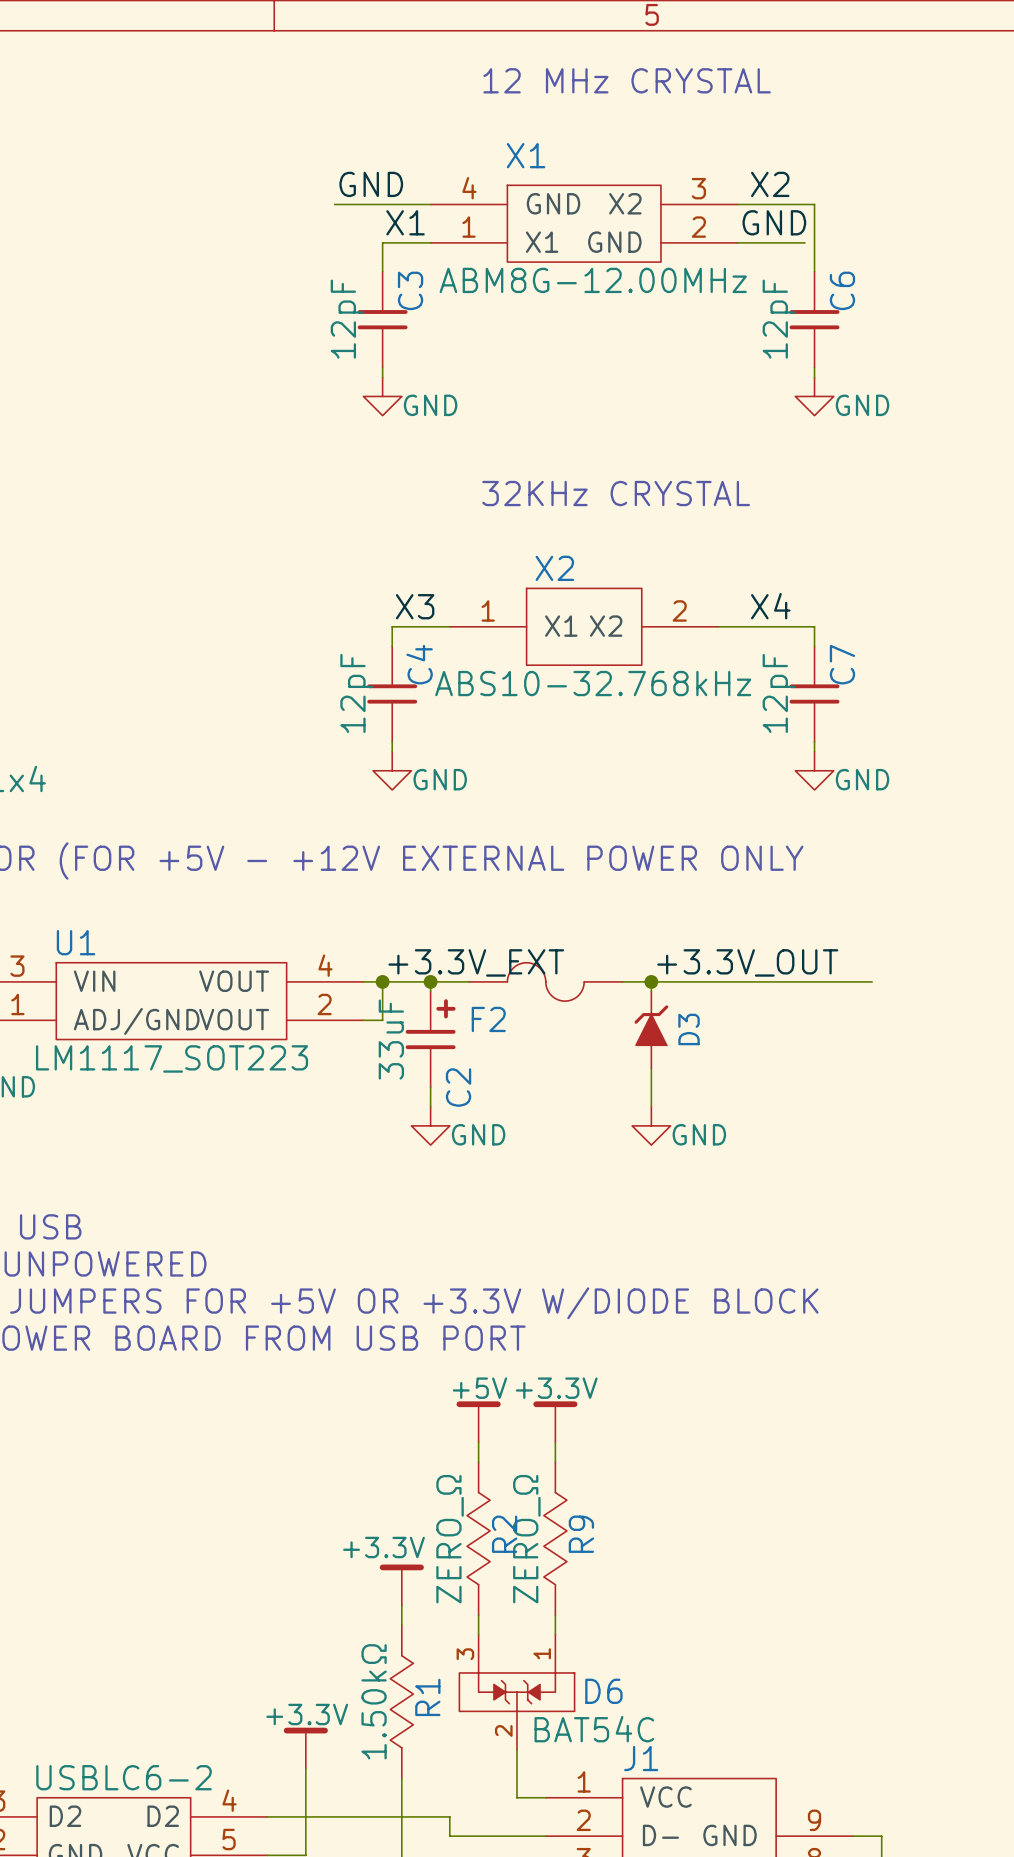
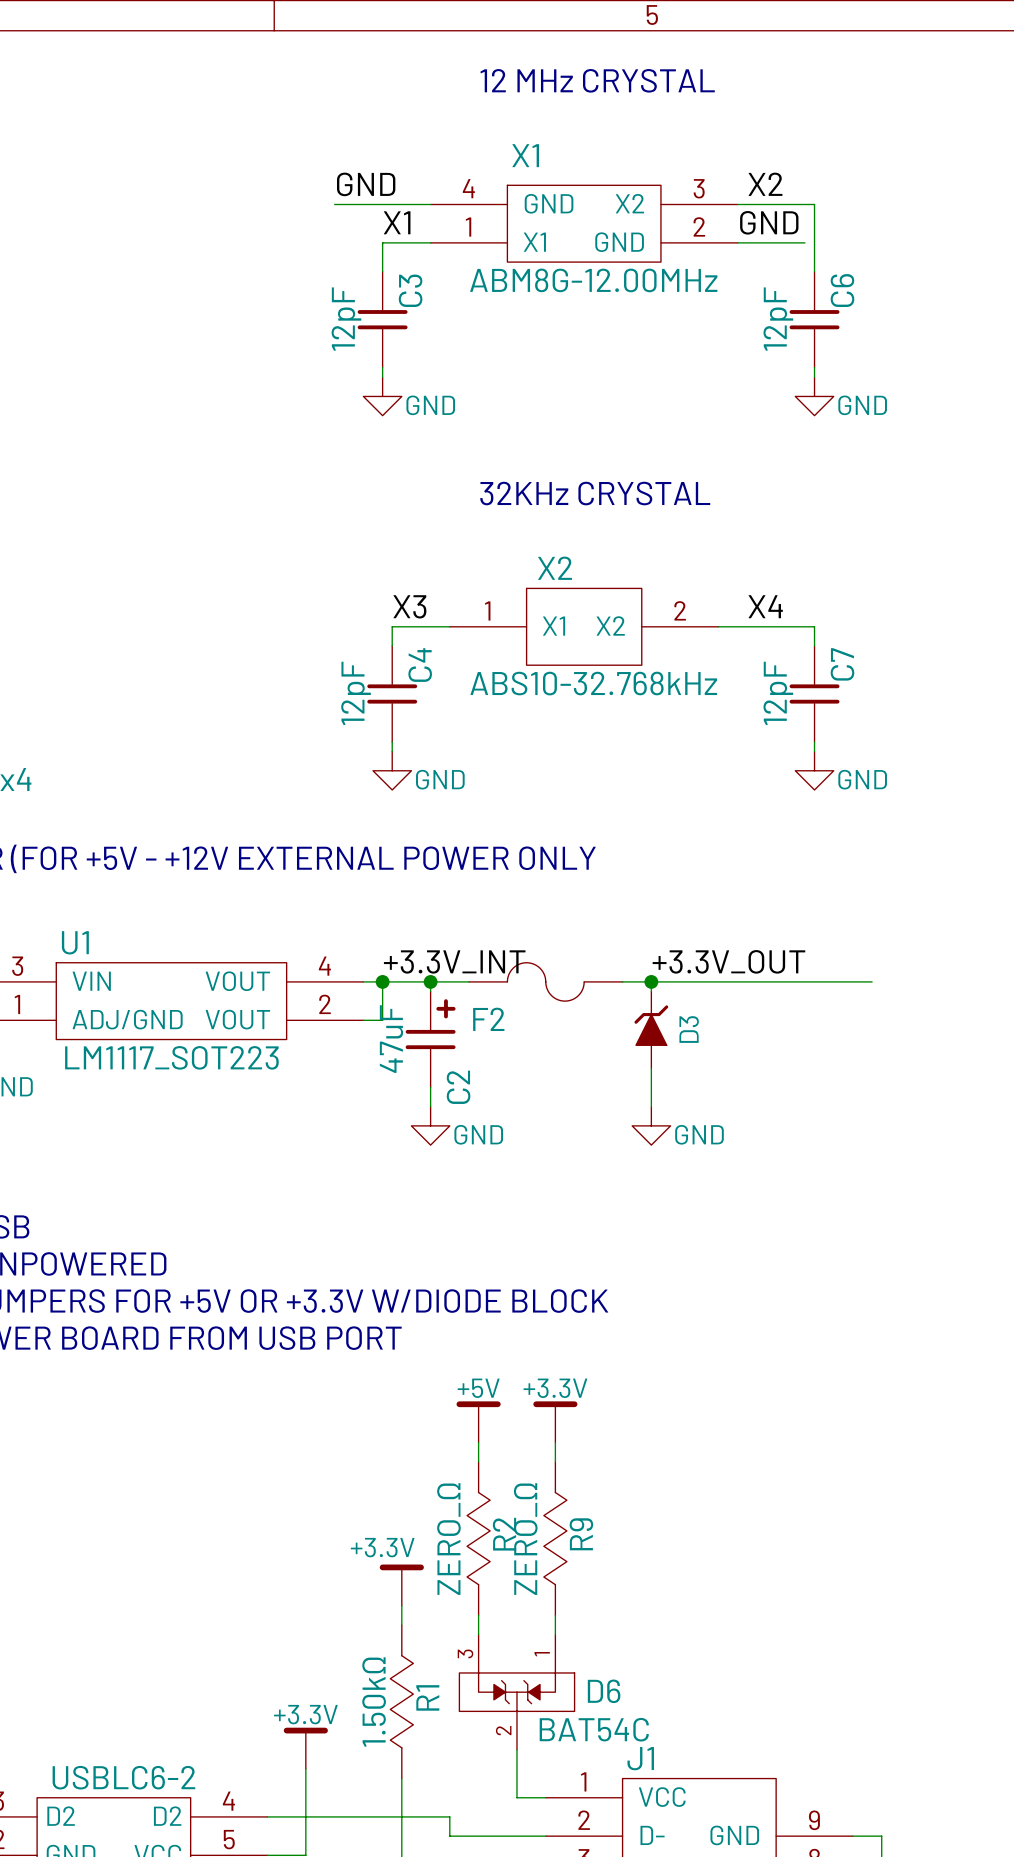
label: +3.3V_EXT (476, 962) -> +3.3V_INT (454, 961)
C2 value: 33uF (391, 1039) -> 47uF (391, 1039)

